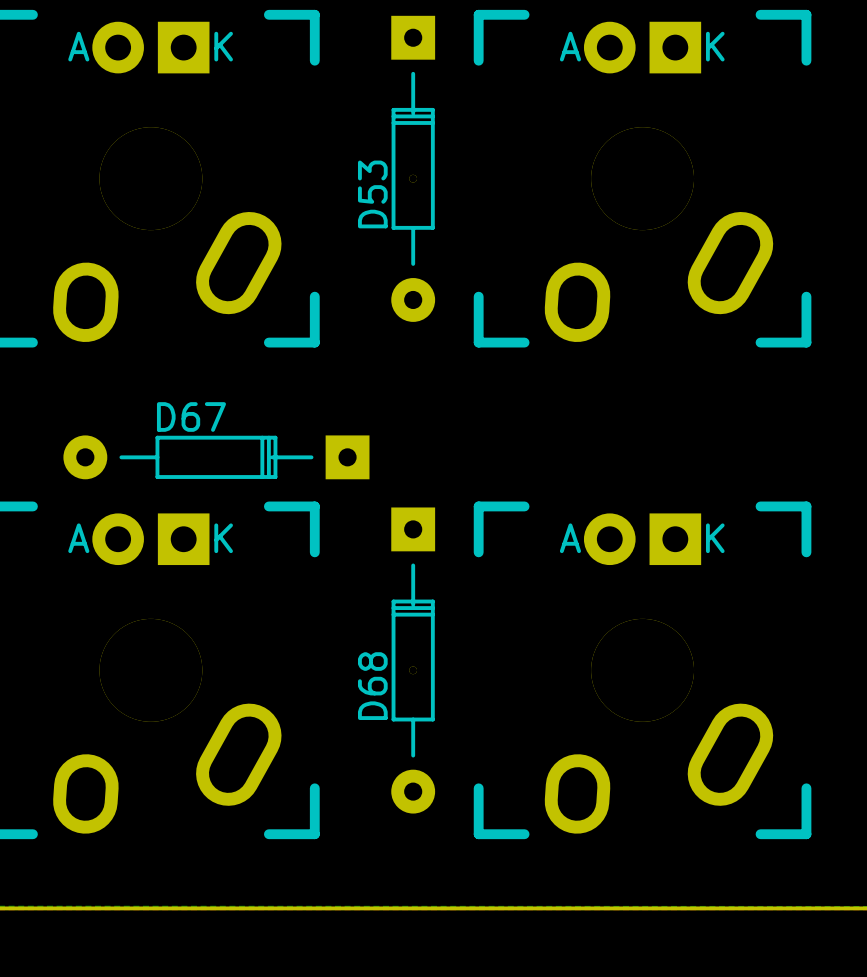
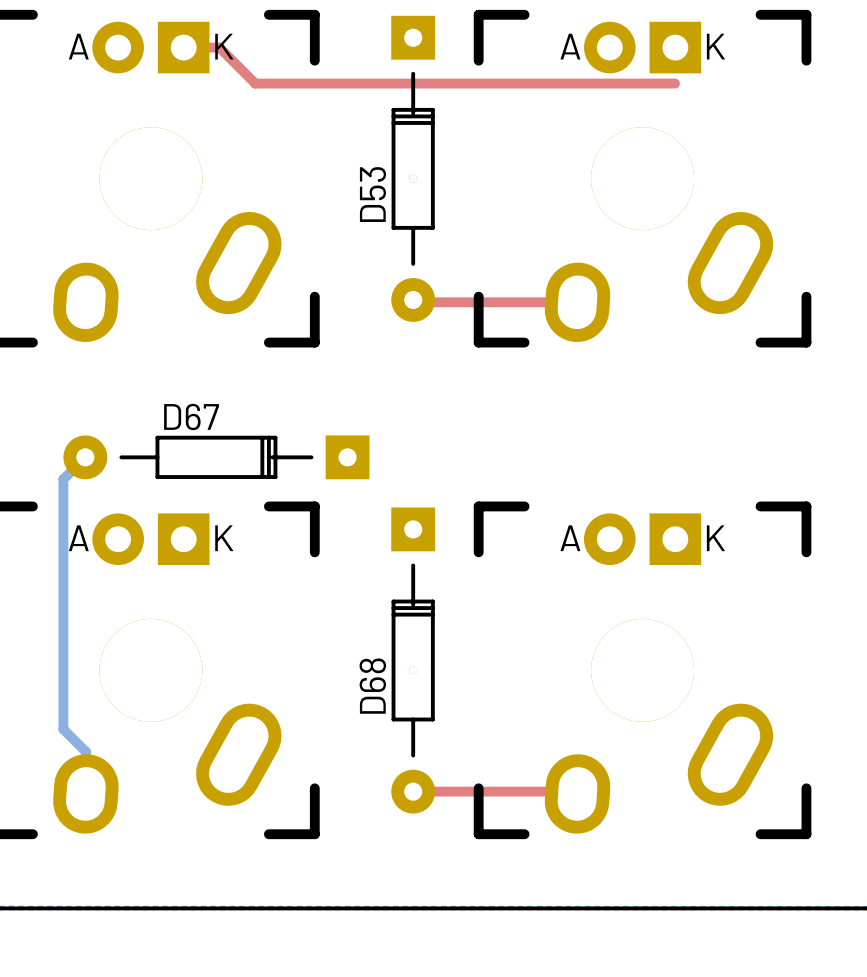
top track: none -> (183, 47) (219, 47) (255, 83) (675, 83)
top track: none -> (413, 299) (415, 302) (577, 302)
bottom track: none -> (85, 457) (63, 479) (63, 729) (85, 751) (85, 793)
top track: none -> (413, 791) (575, 791) (577, 793)

